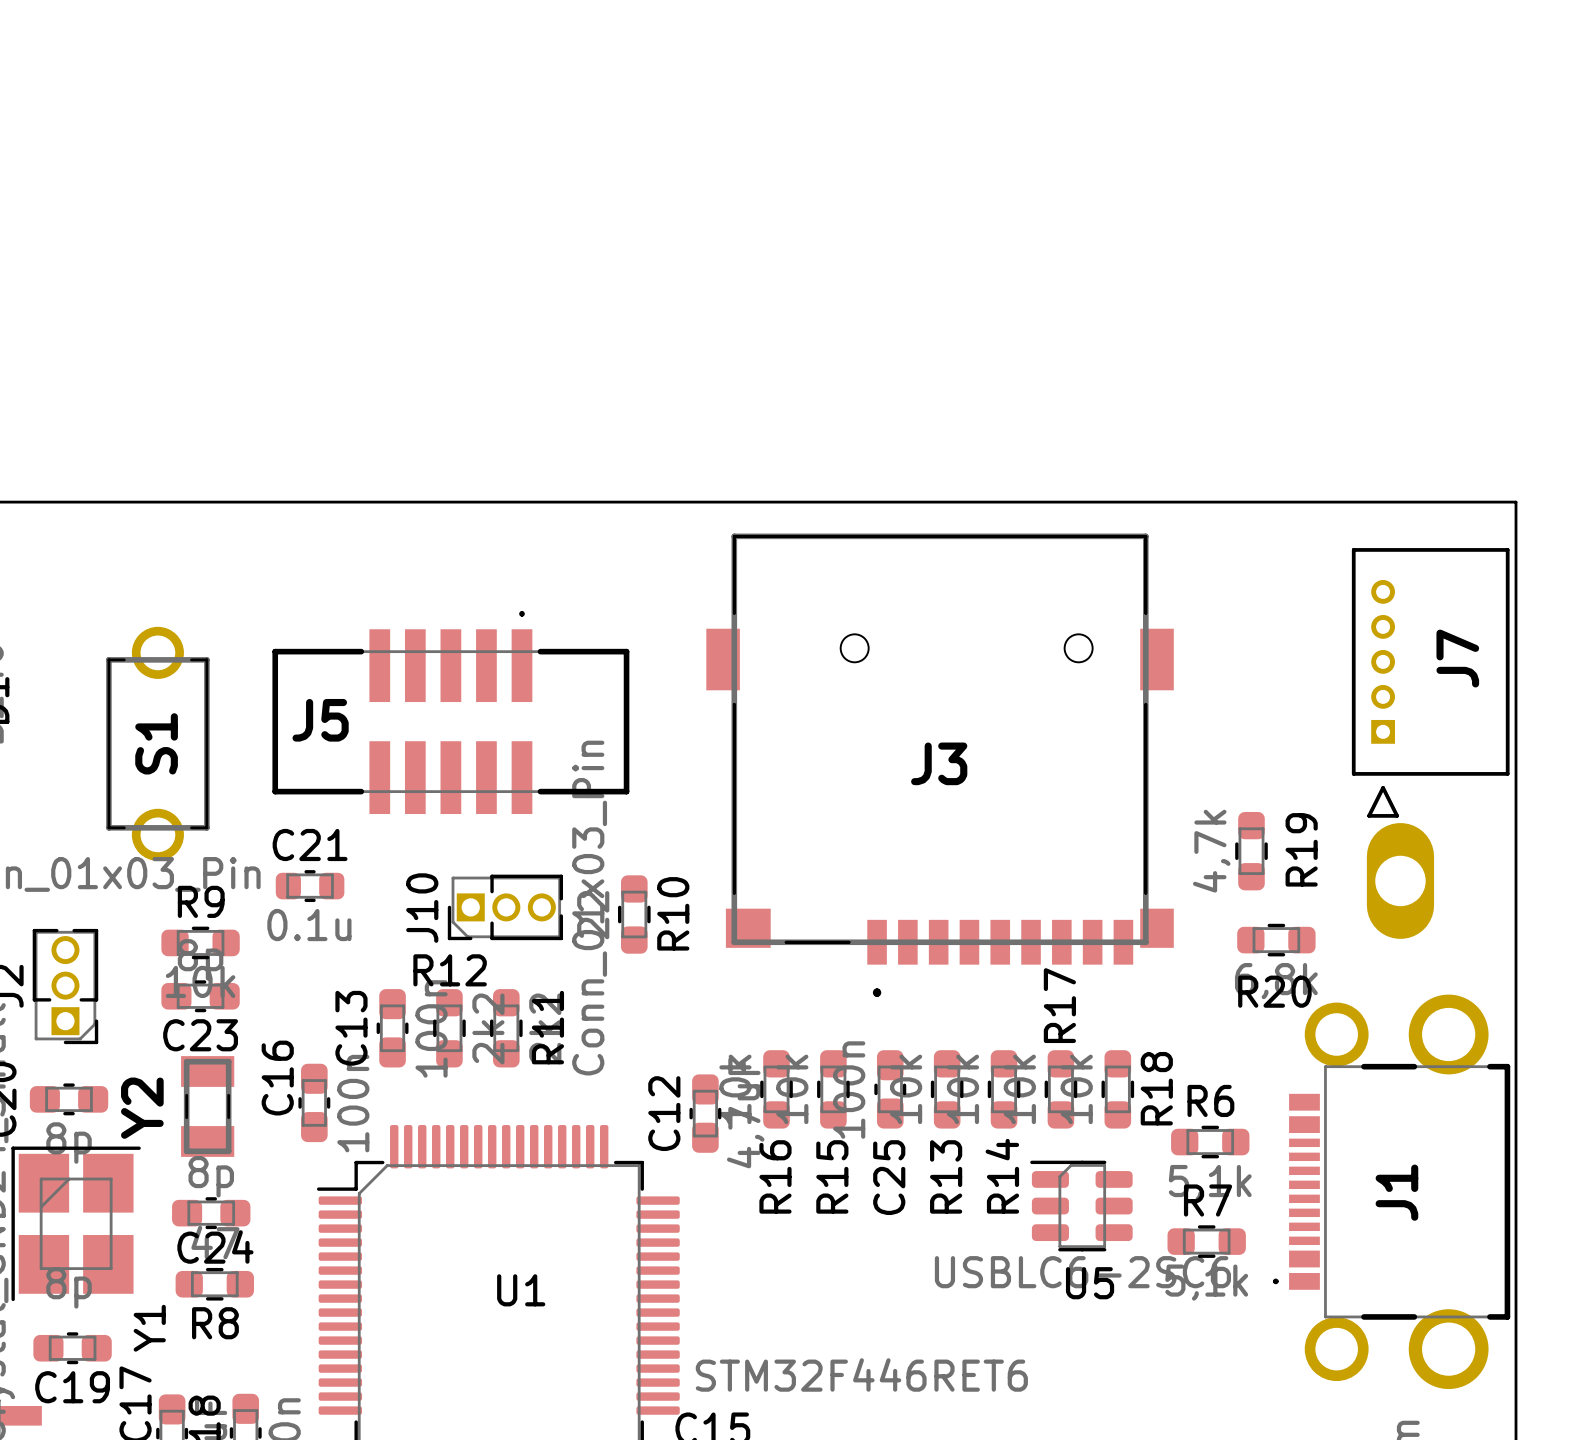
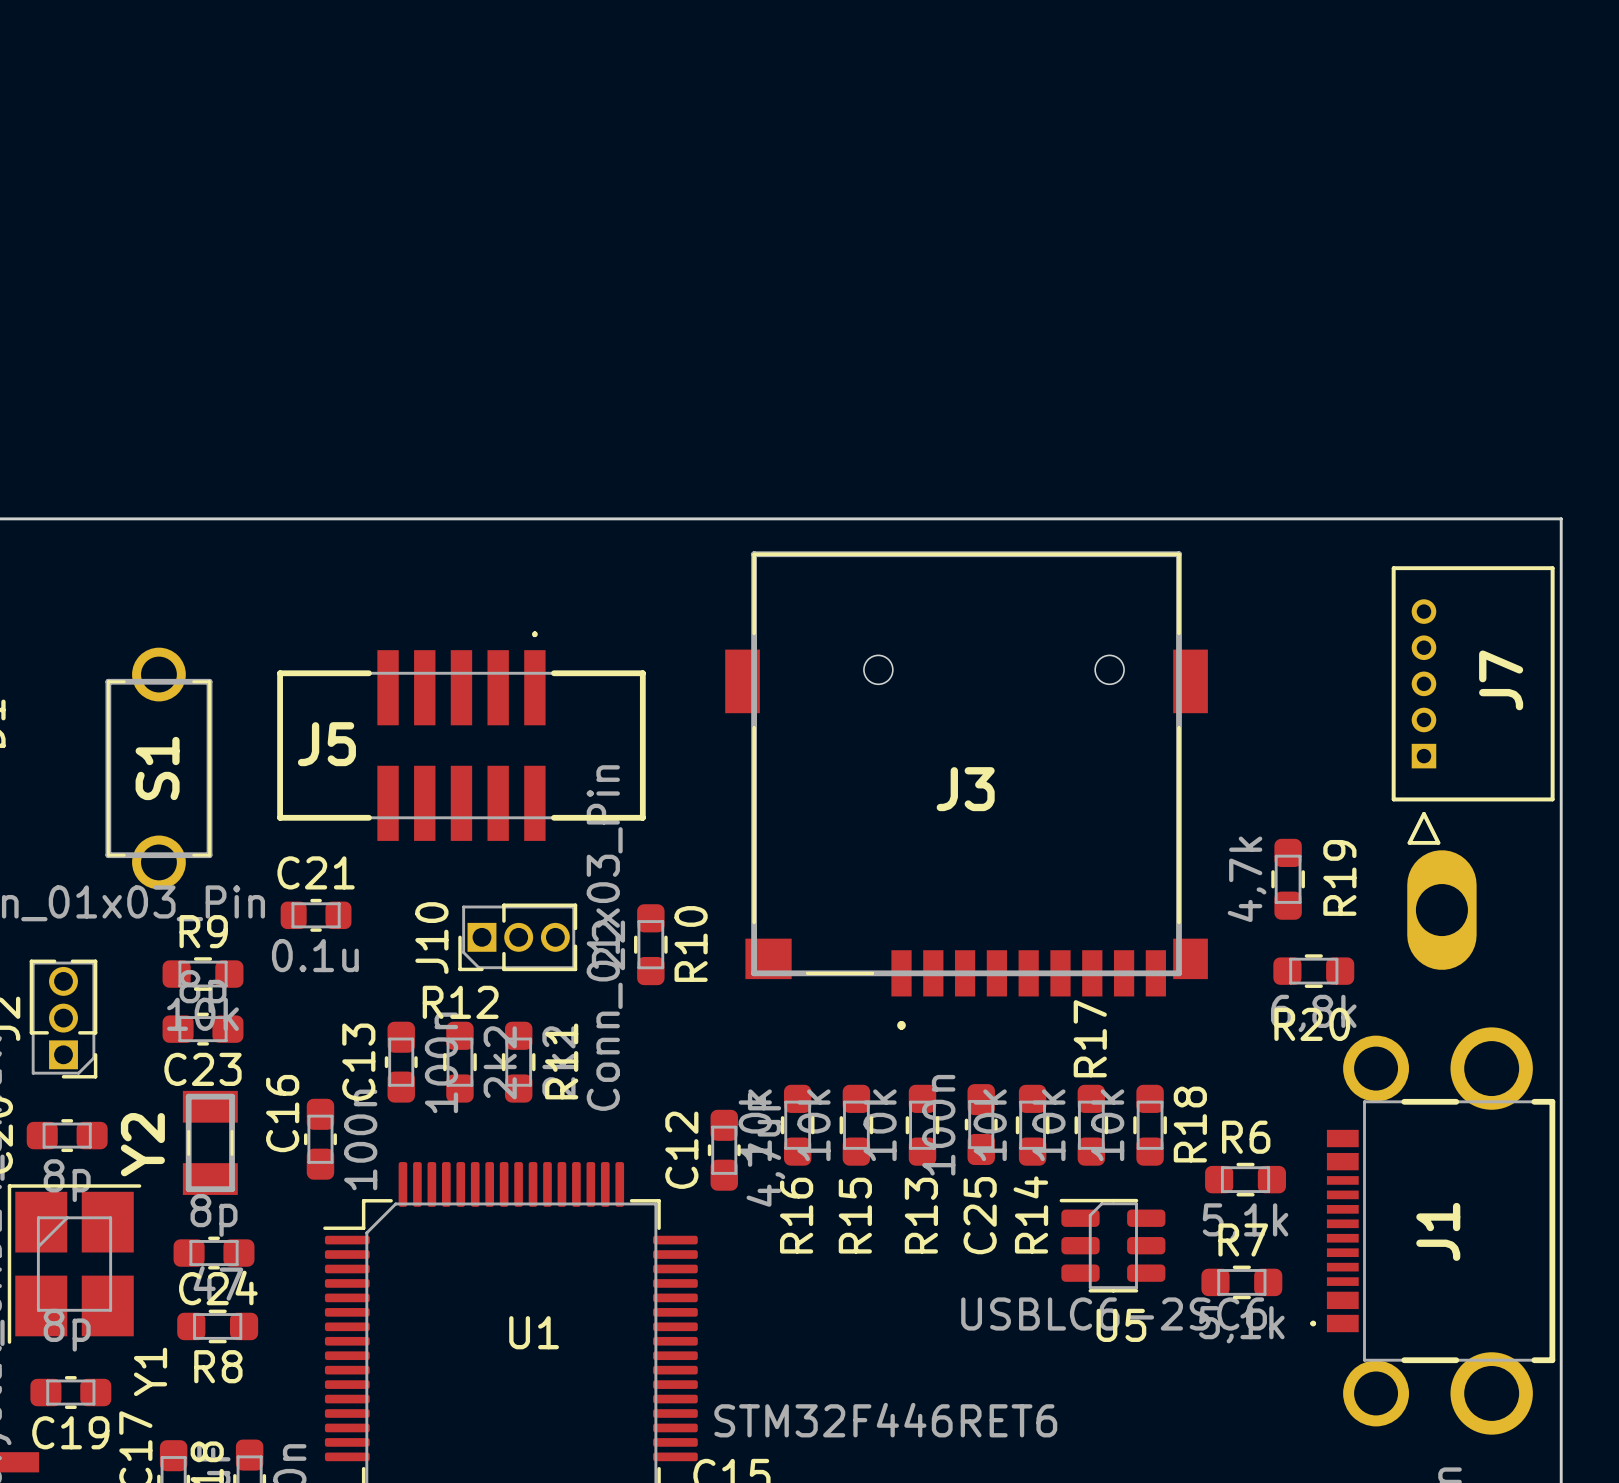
C25 position: (890, 1089) -> (981, 1124)
R13 position: (947, 1089) -> (922, 1125)

